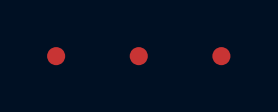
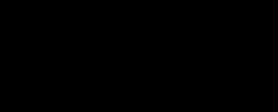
part: (56, 56) -> none
part: (138, 56) -> none
part: (221, 56) -> none

